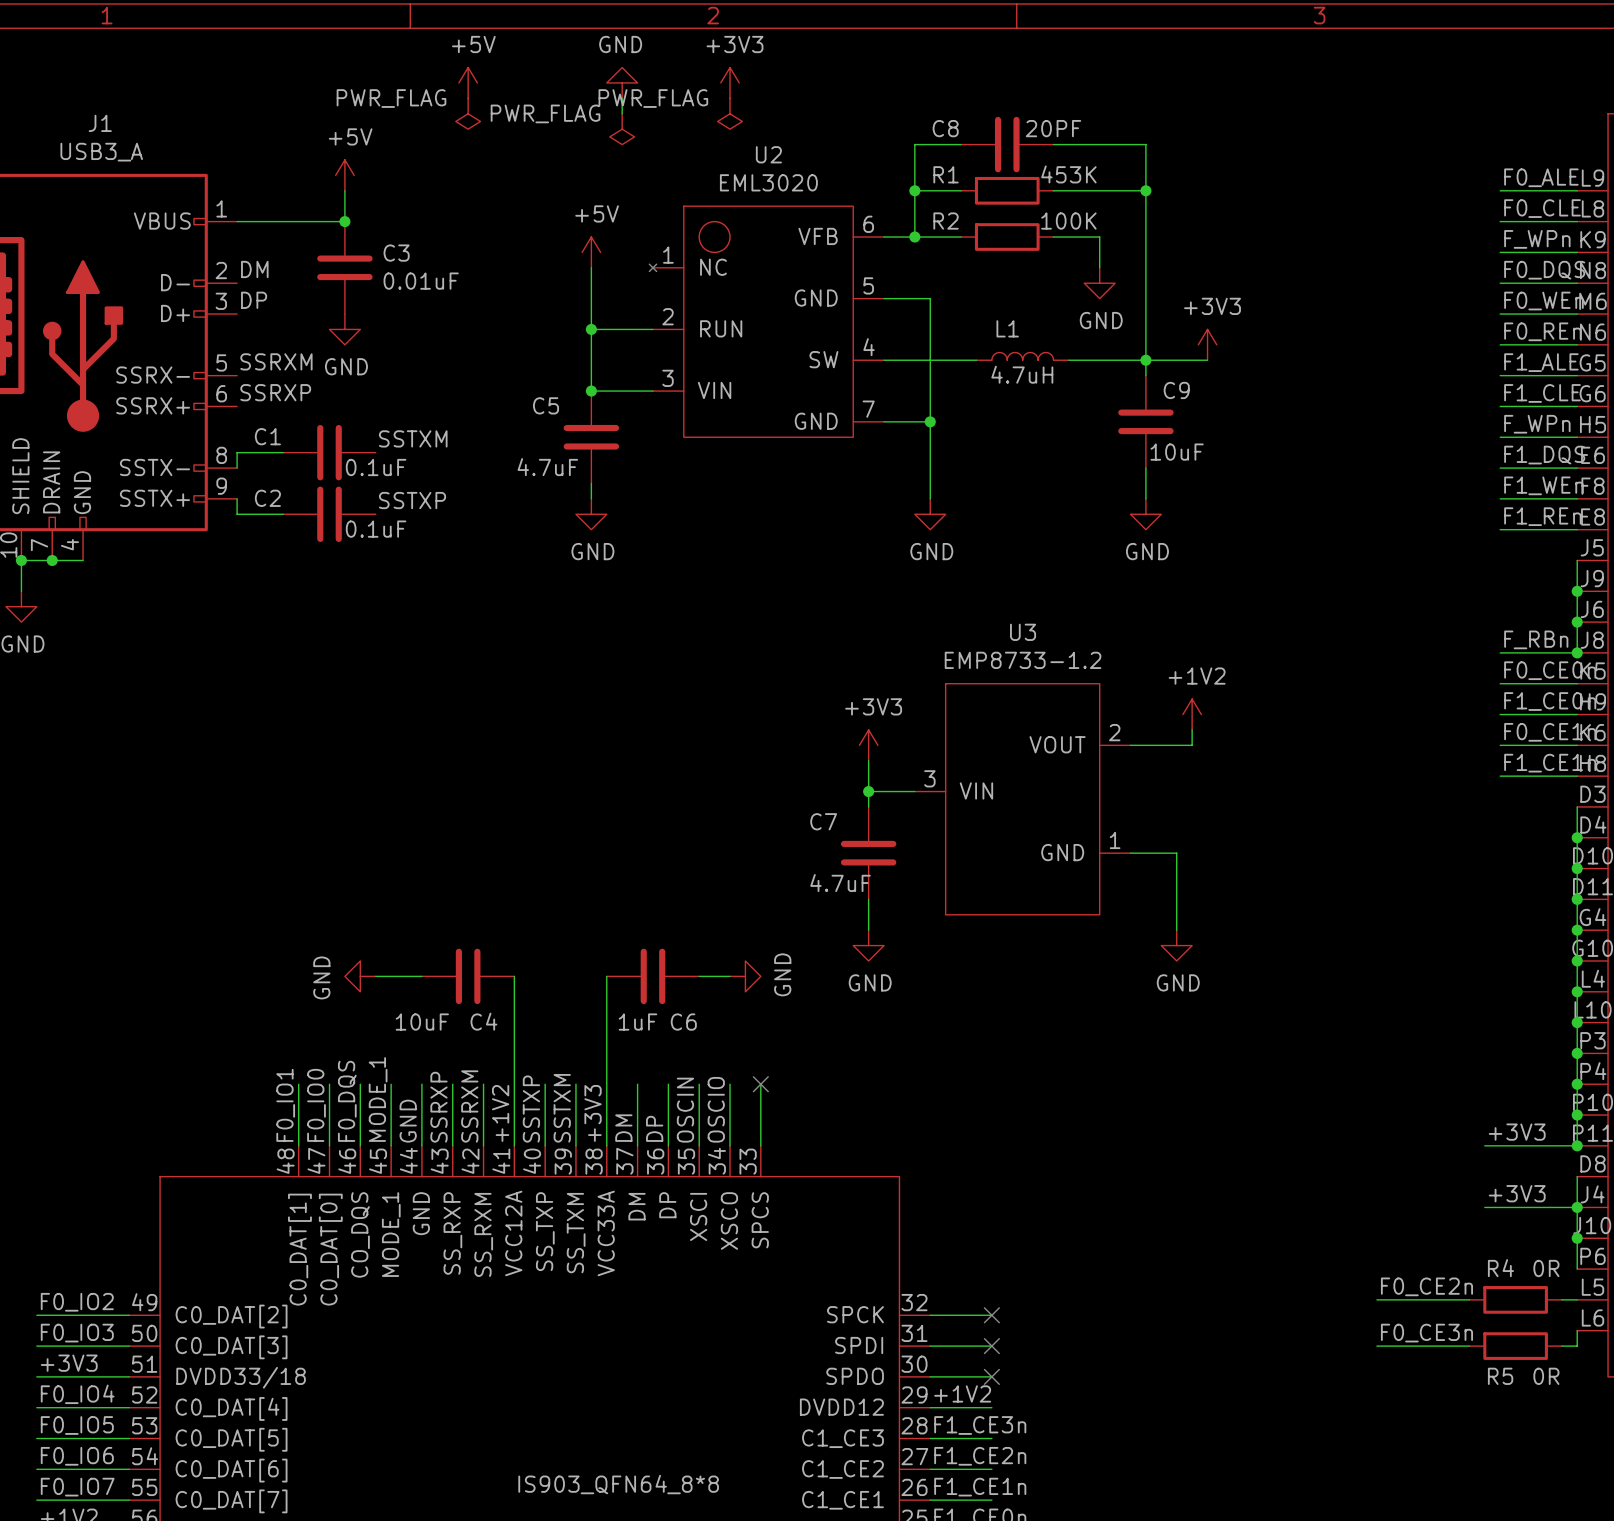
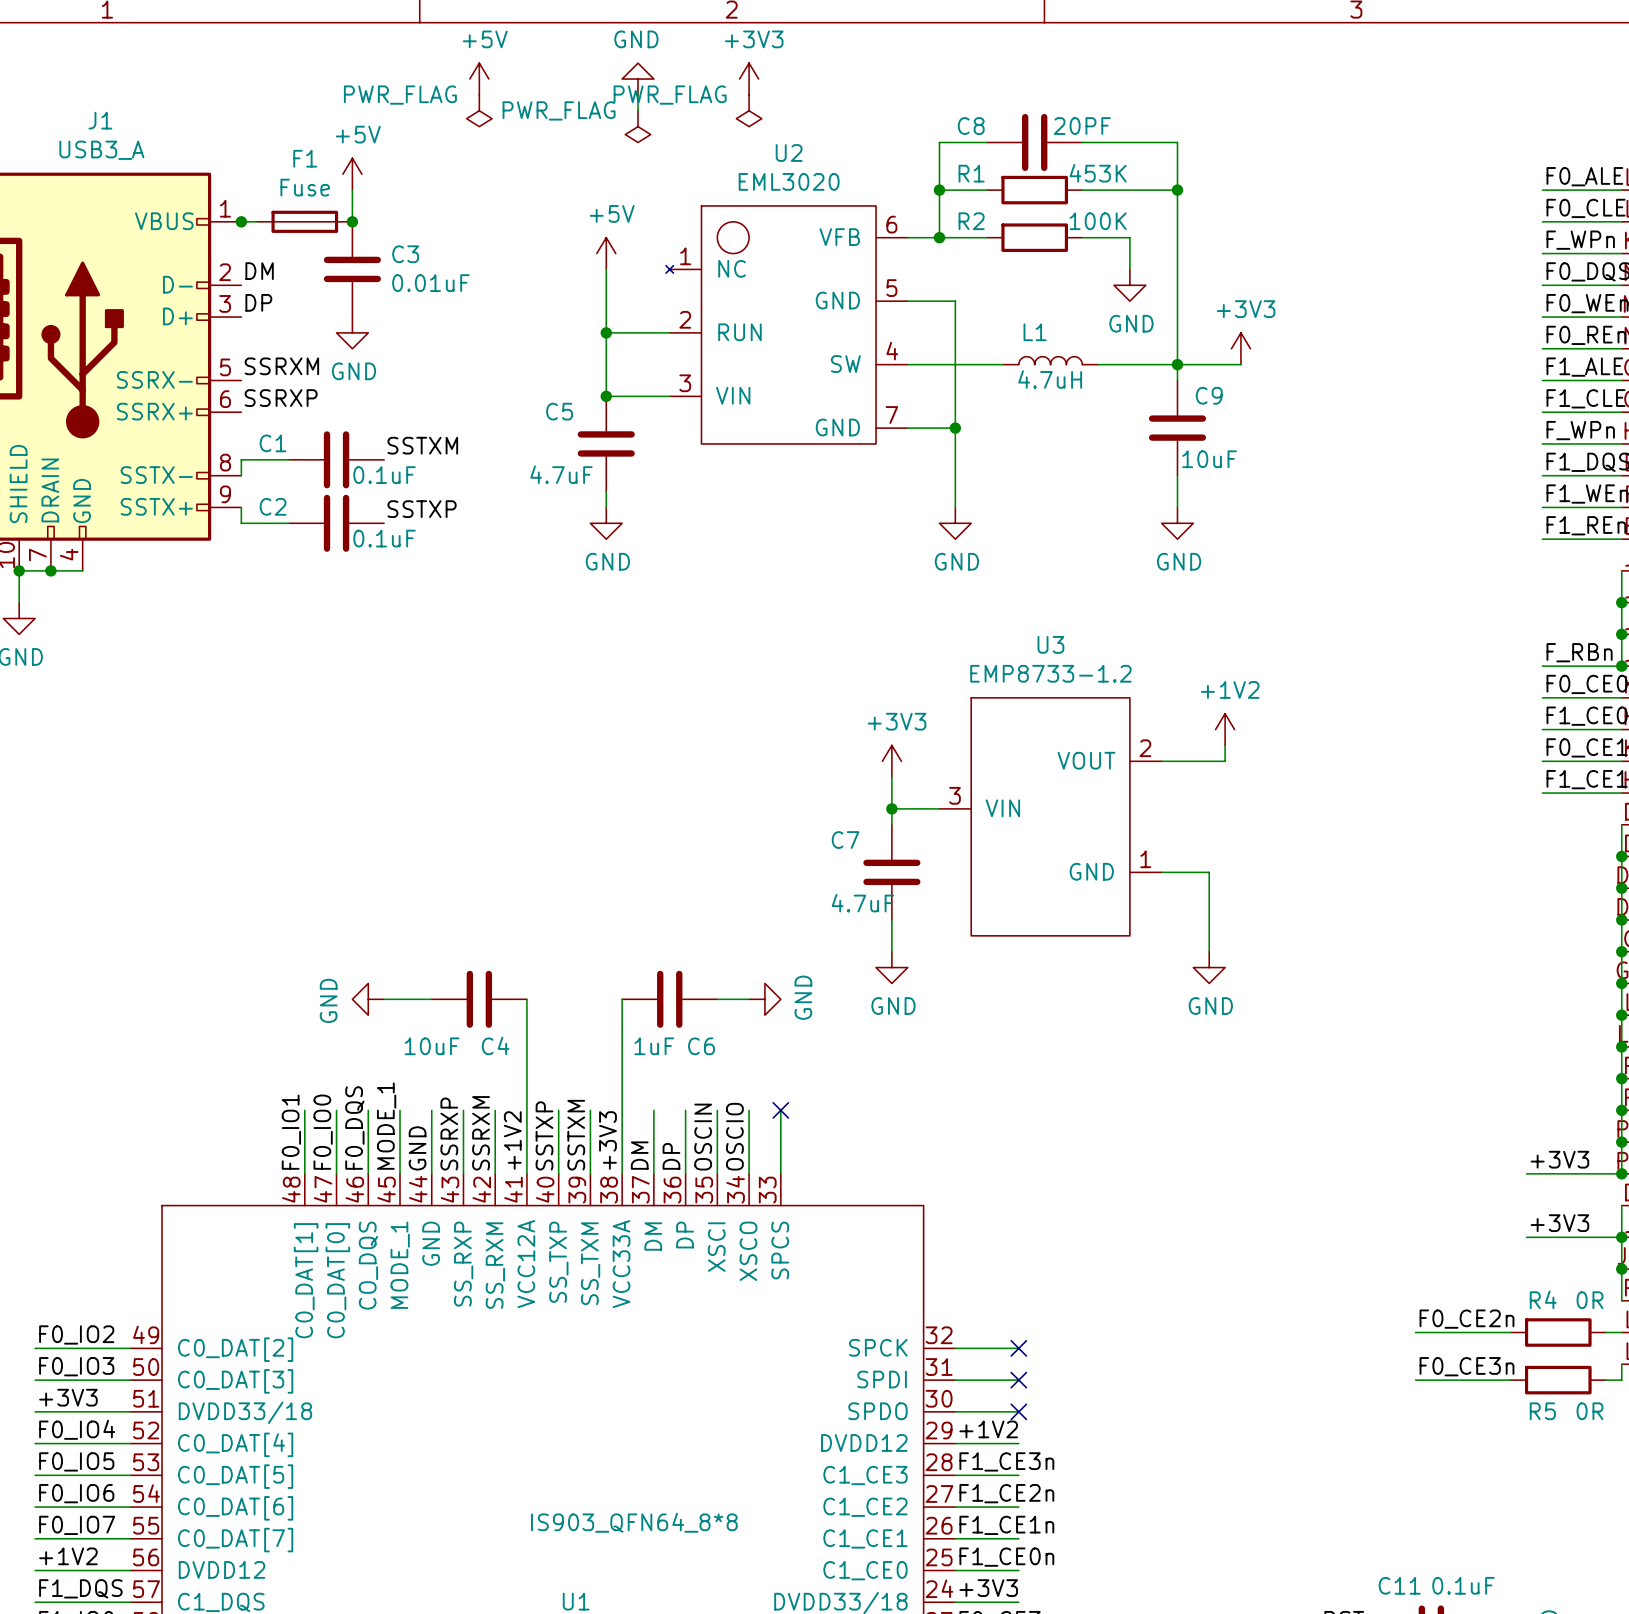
junction: none -> (241, 221)
F1: none -> Fuse (304, 221)

